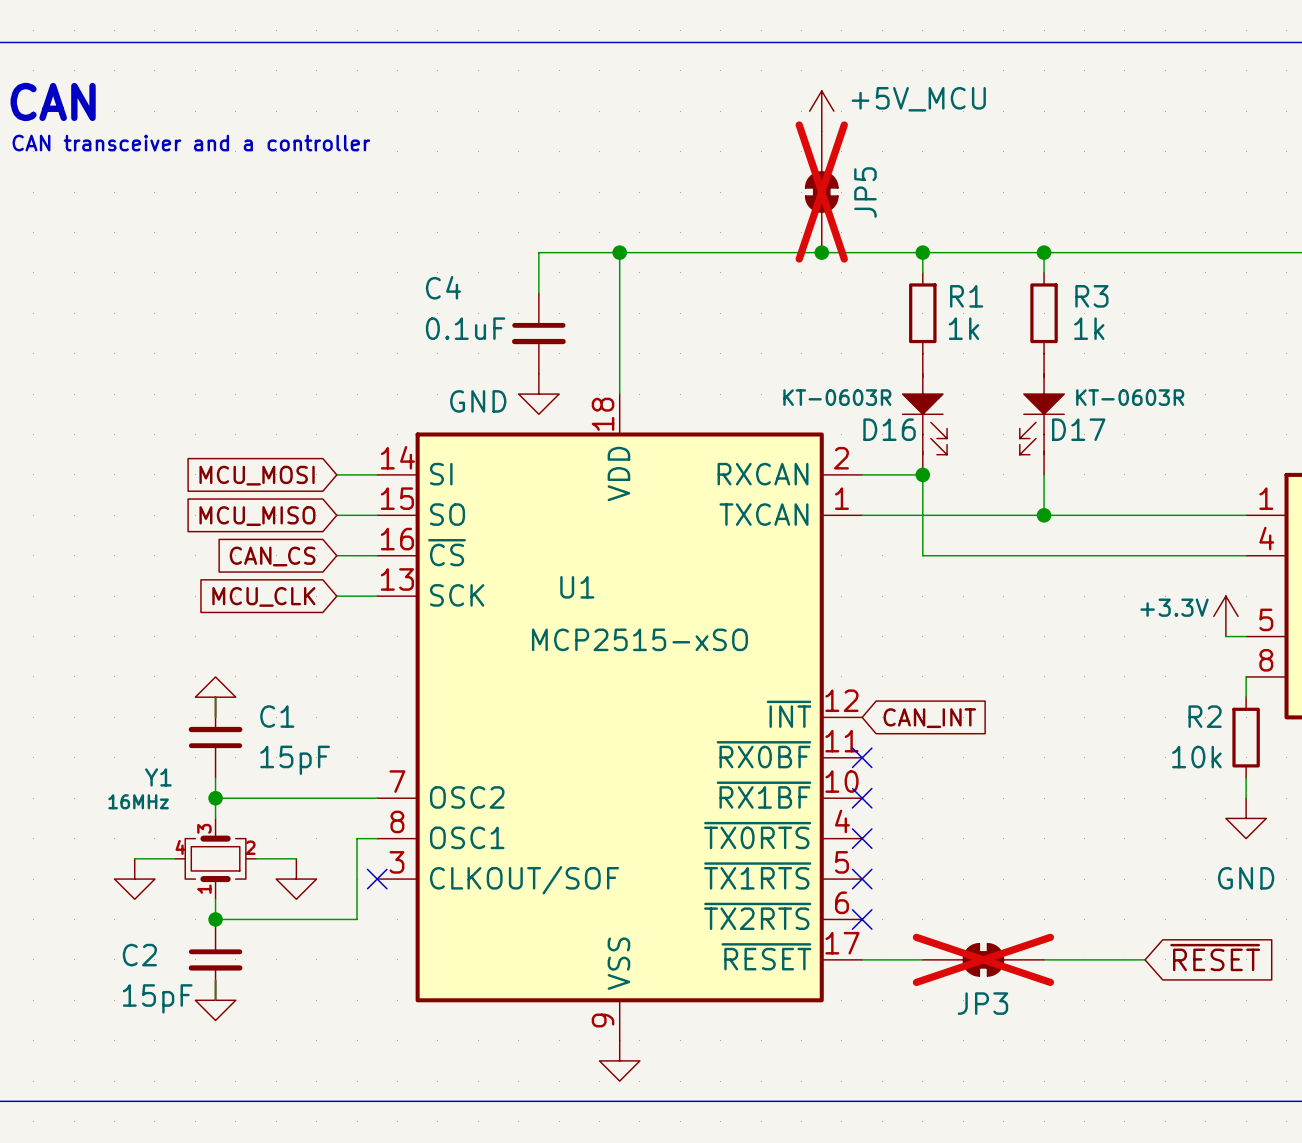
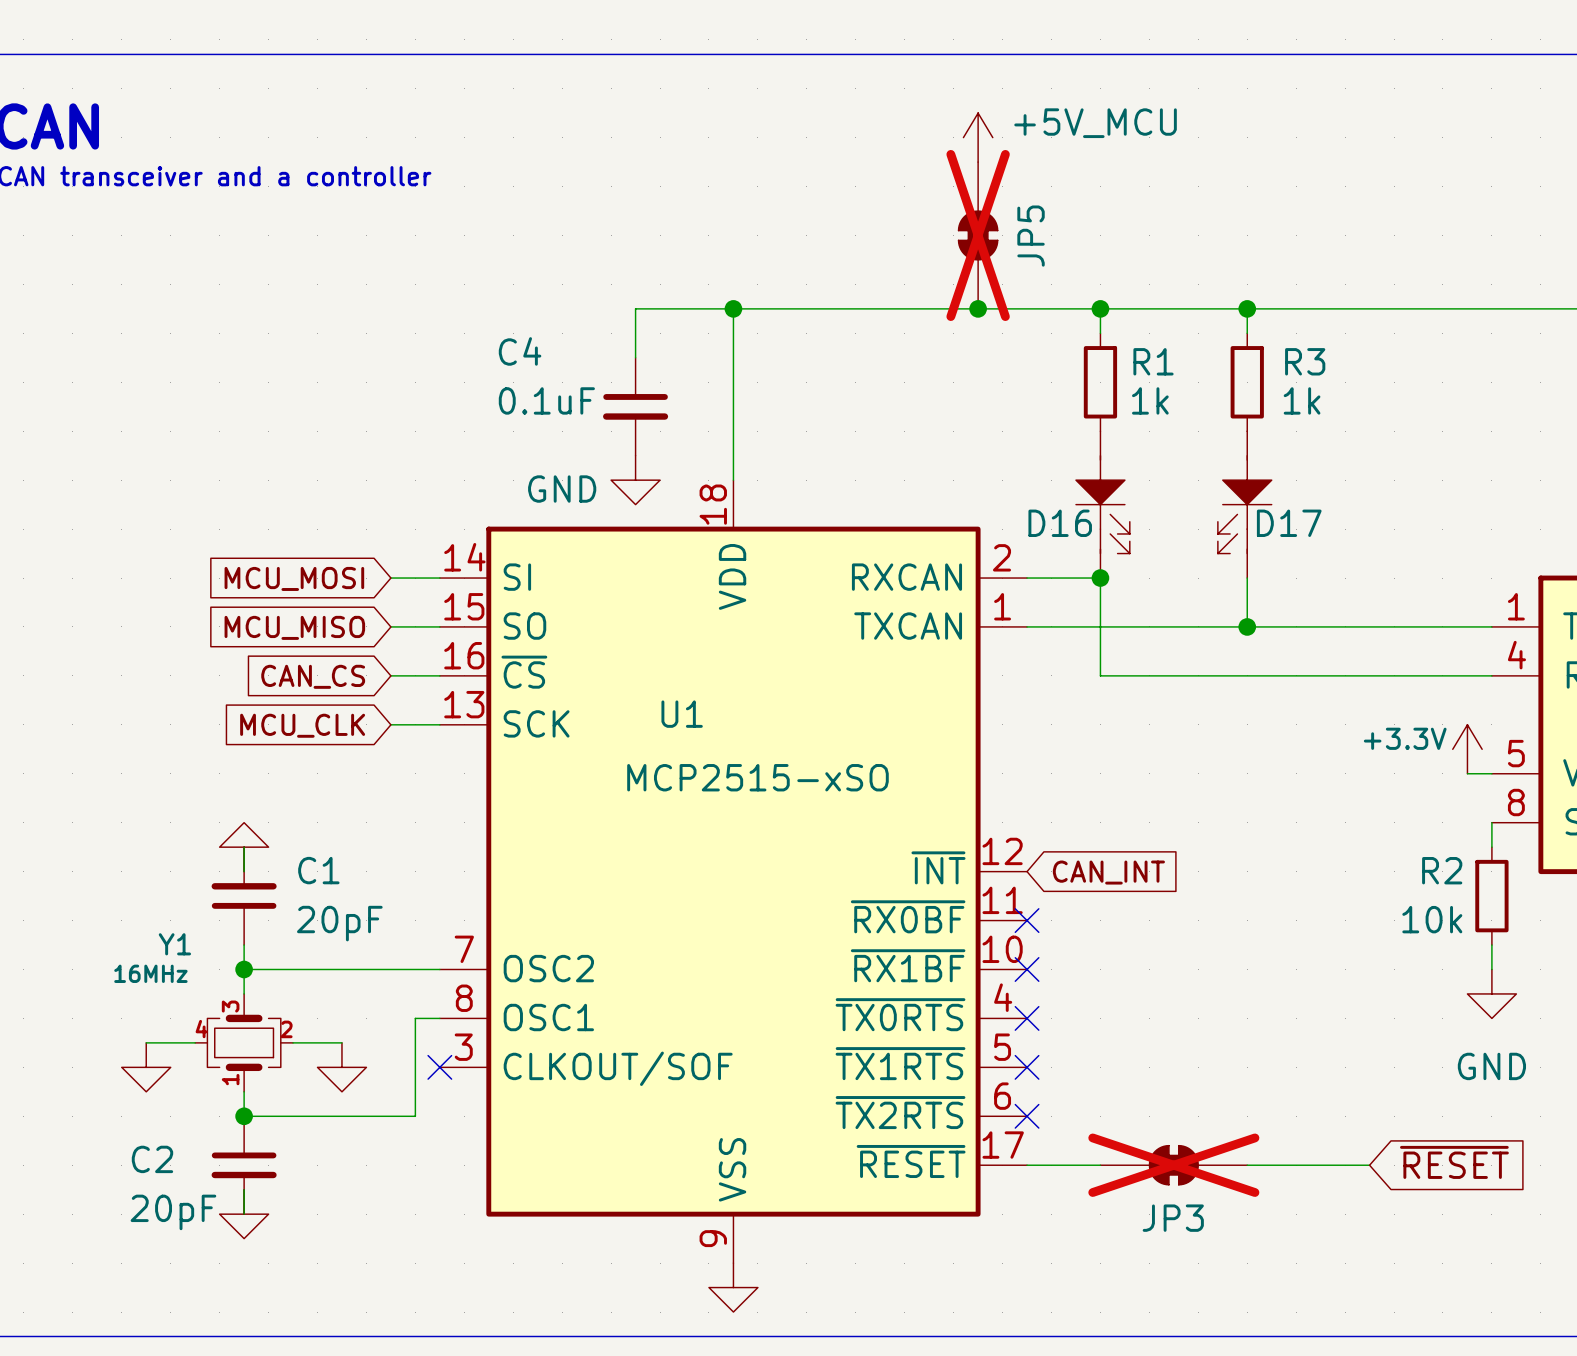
D16 value: KT-0603R (837, 397) -> none
D17 value: KT-0603R (1130, 397) -> none
C1 value: 15pF (295, 760) -> 20pF (339, 923)
C2 value: 15pF (157, 998) -> 20pF (173, 1212)

